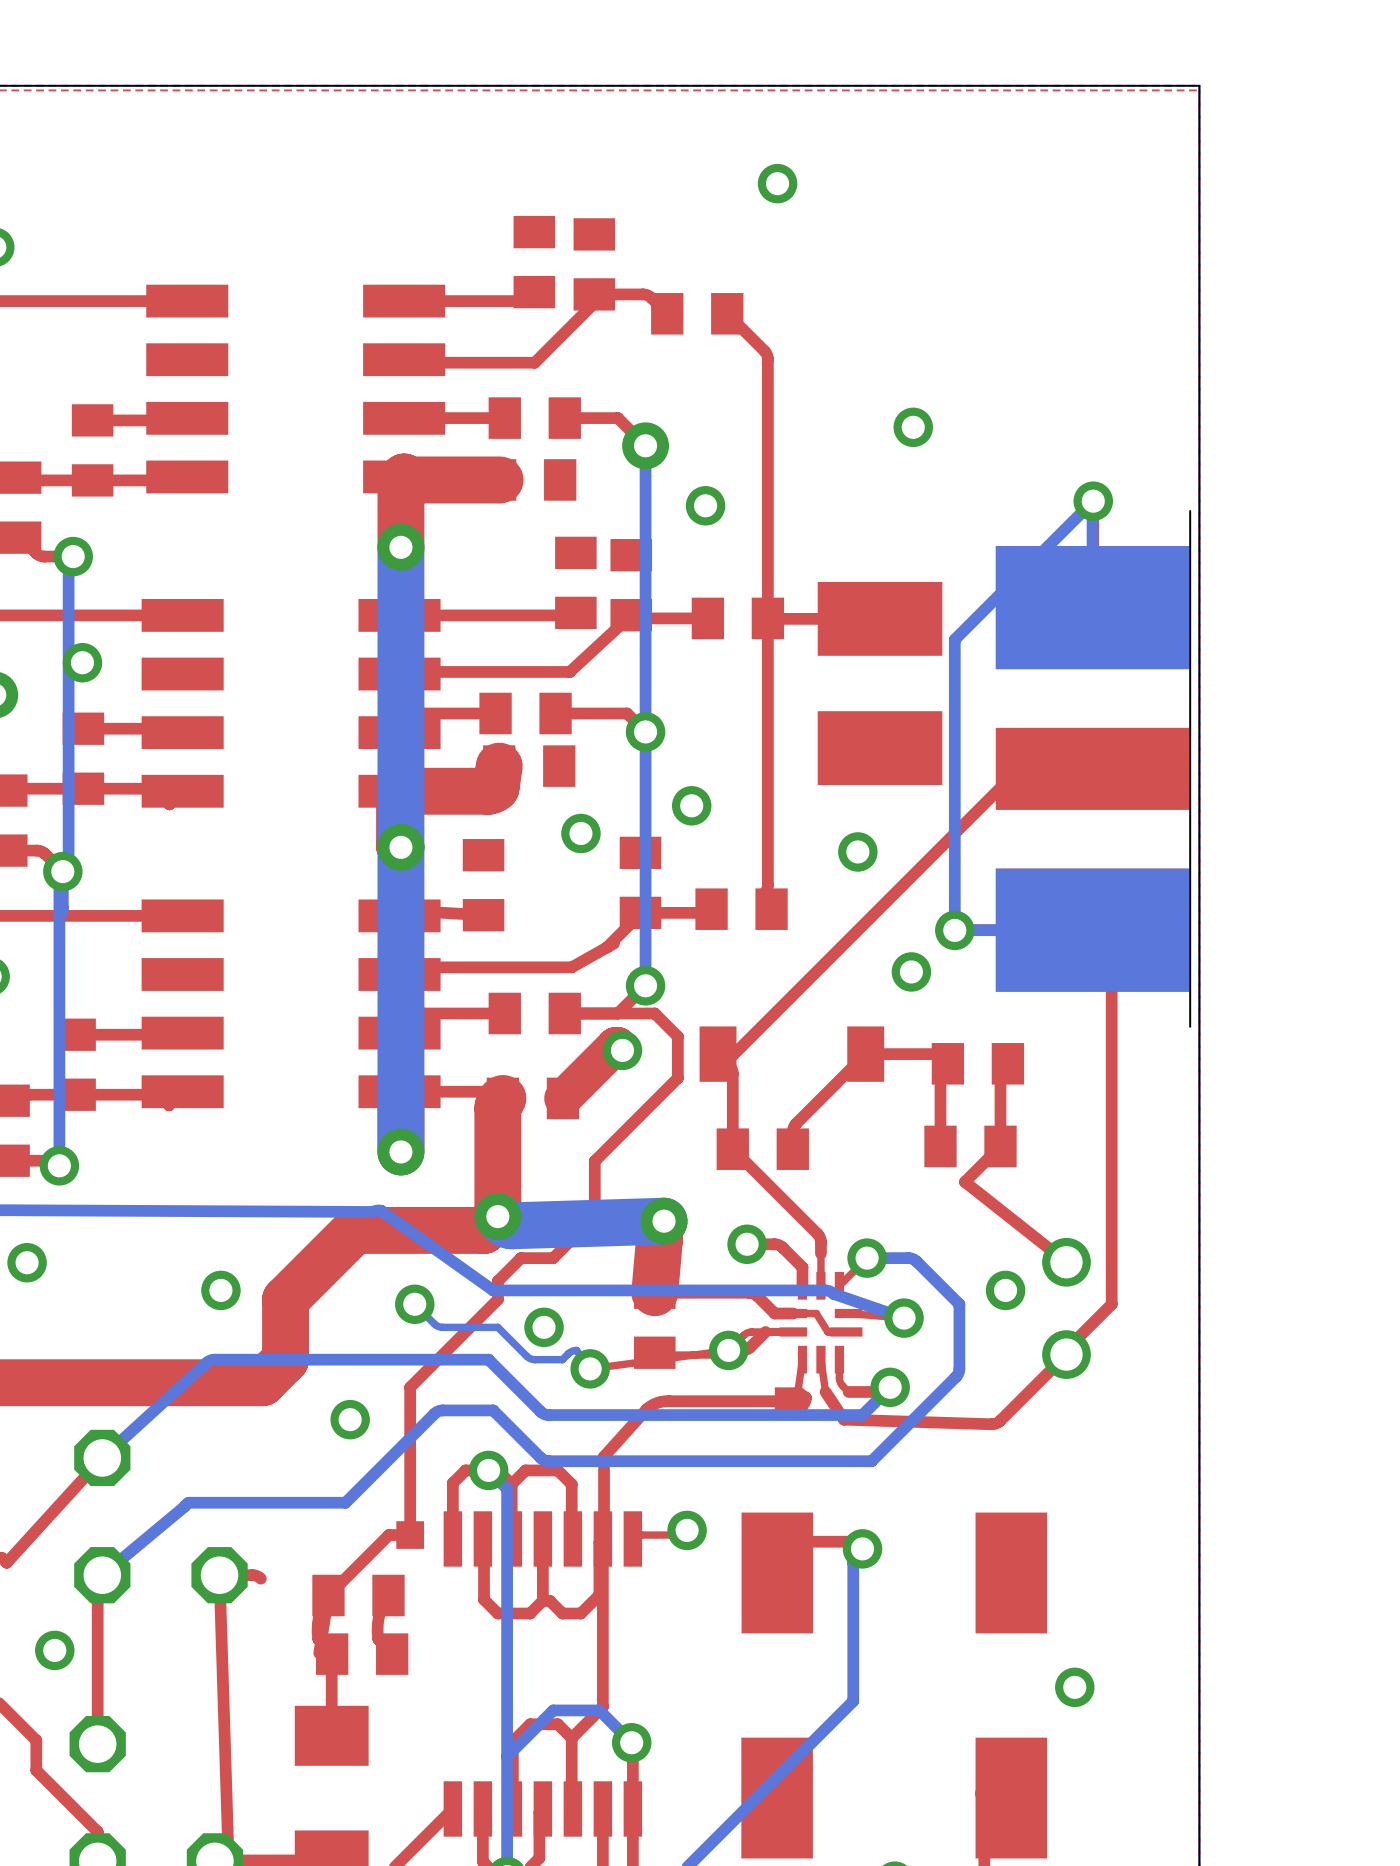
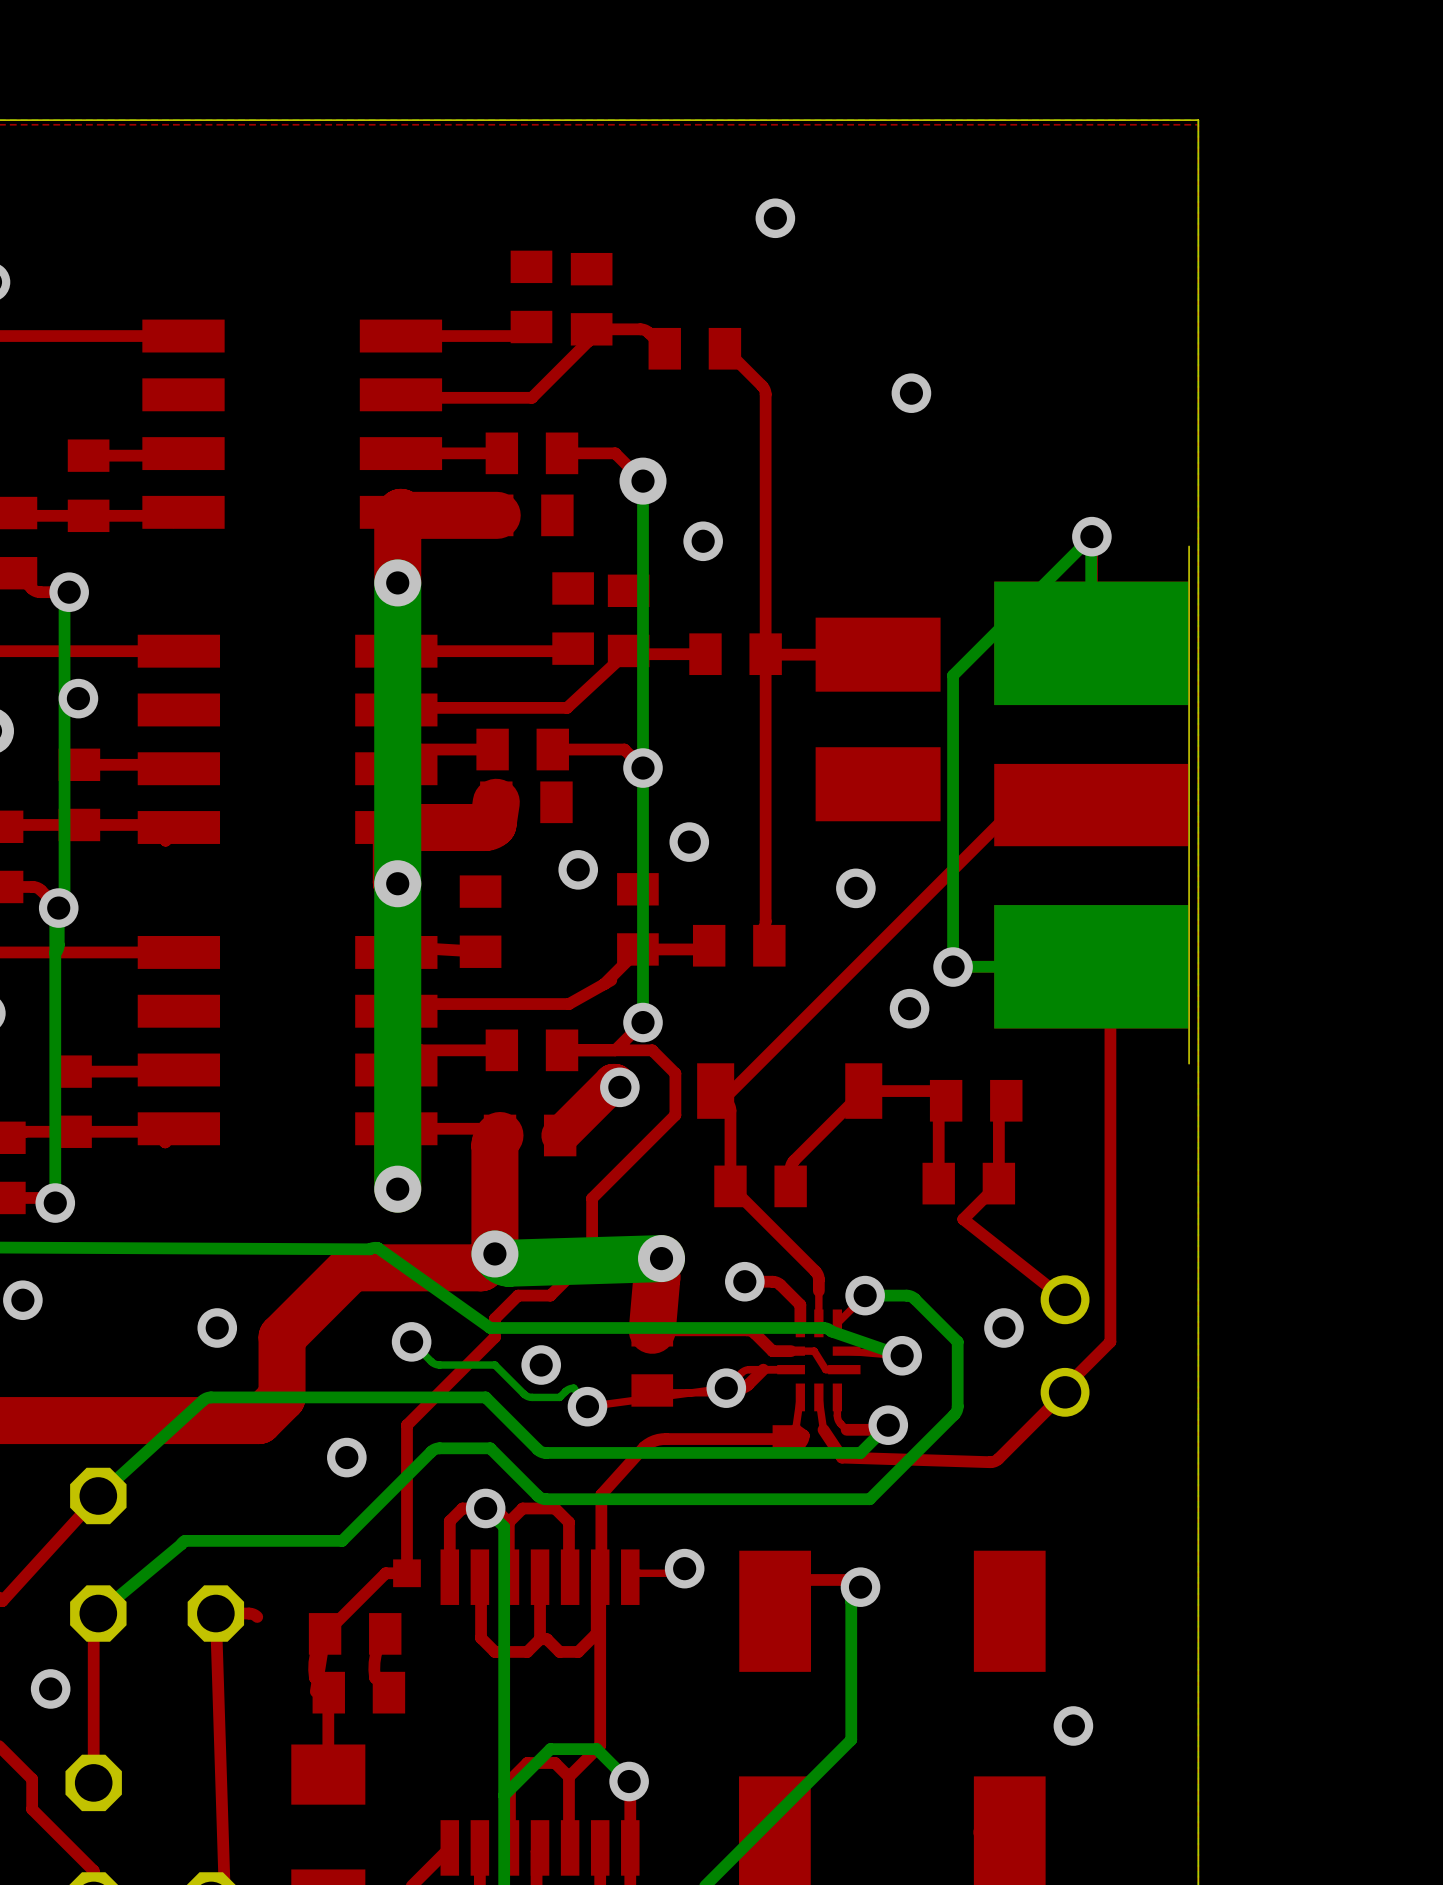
via position: (913, 427) -> (911, 393)

